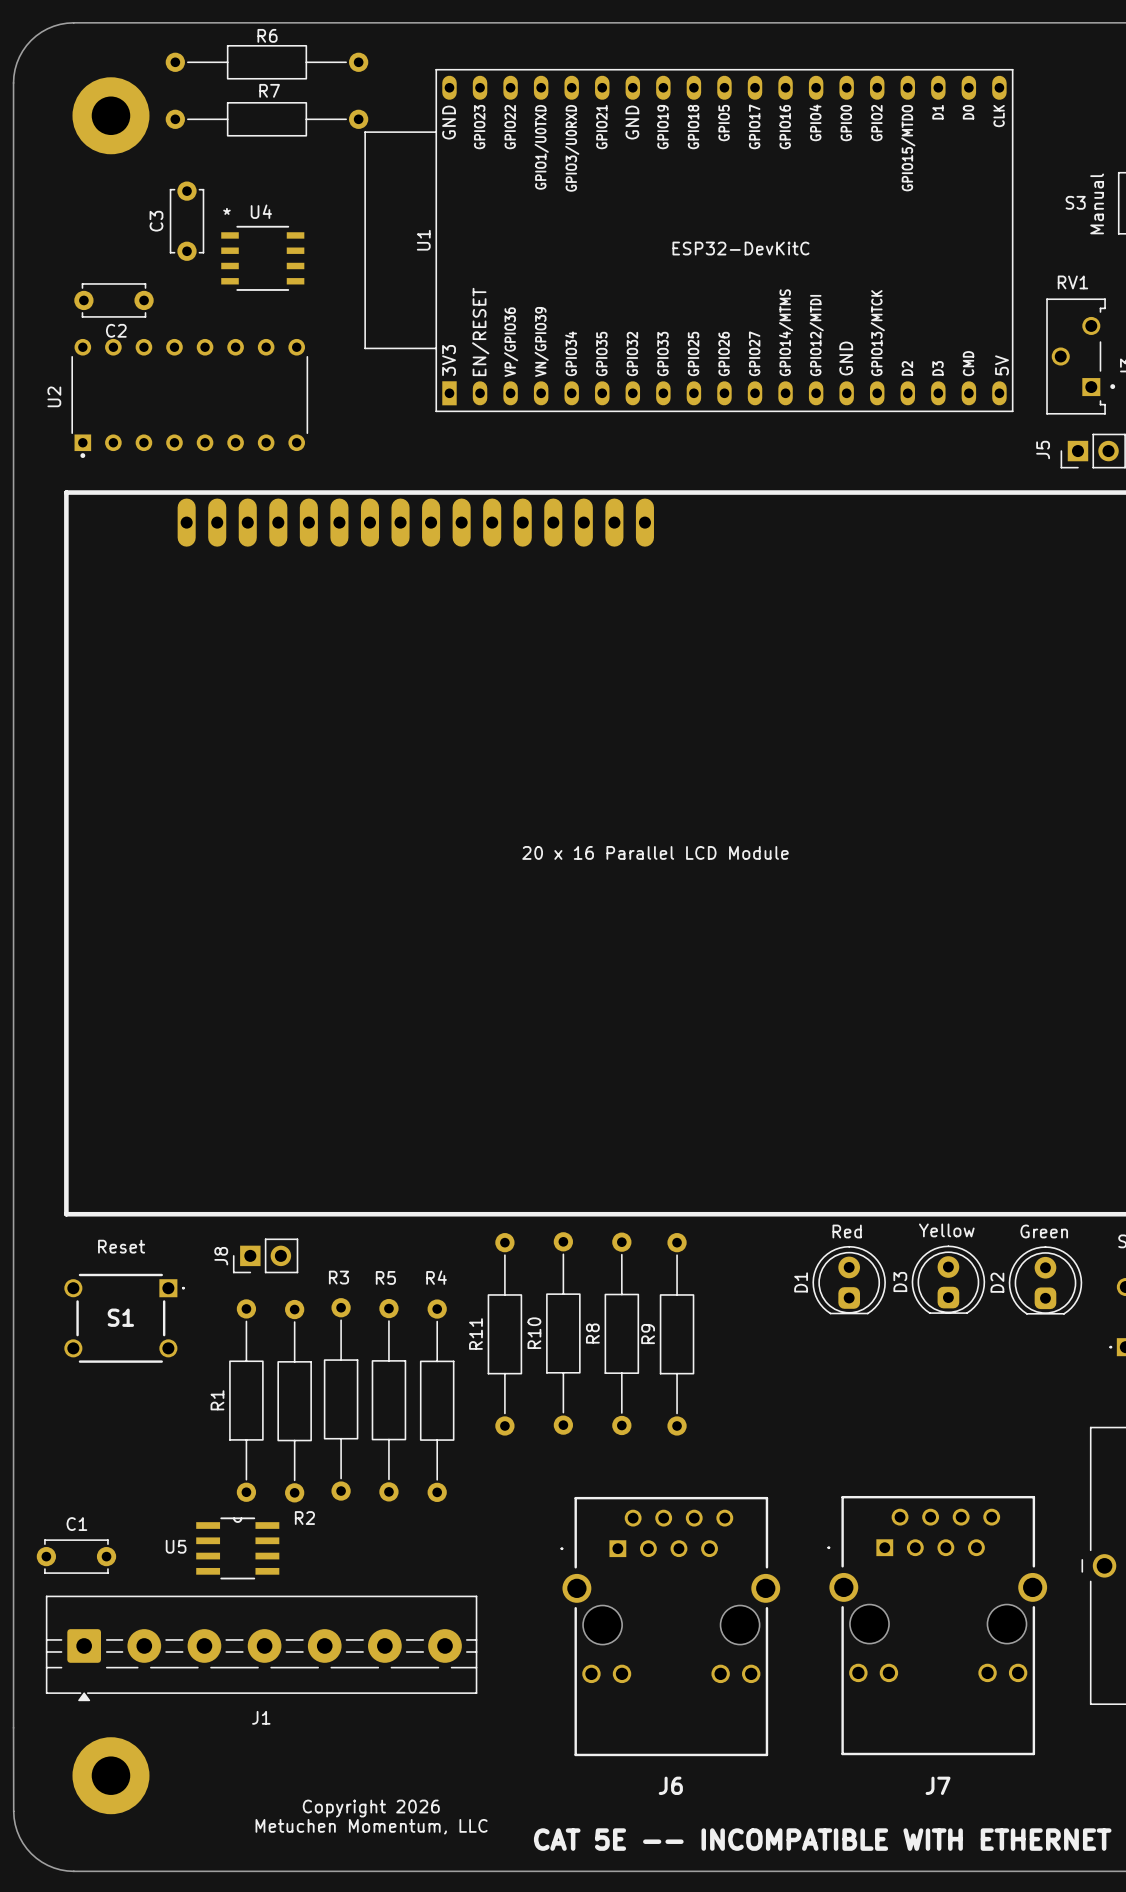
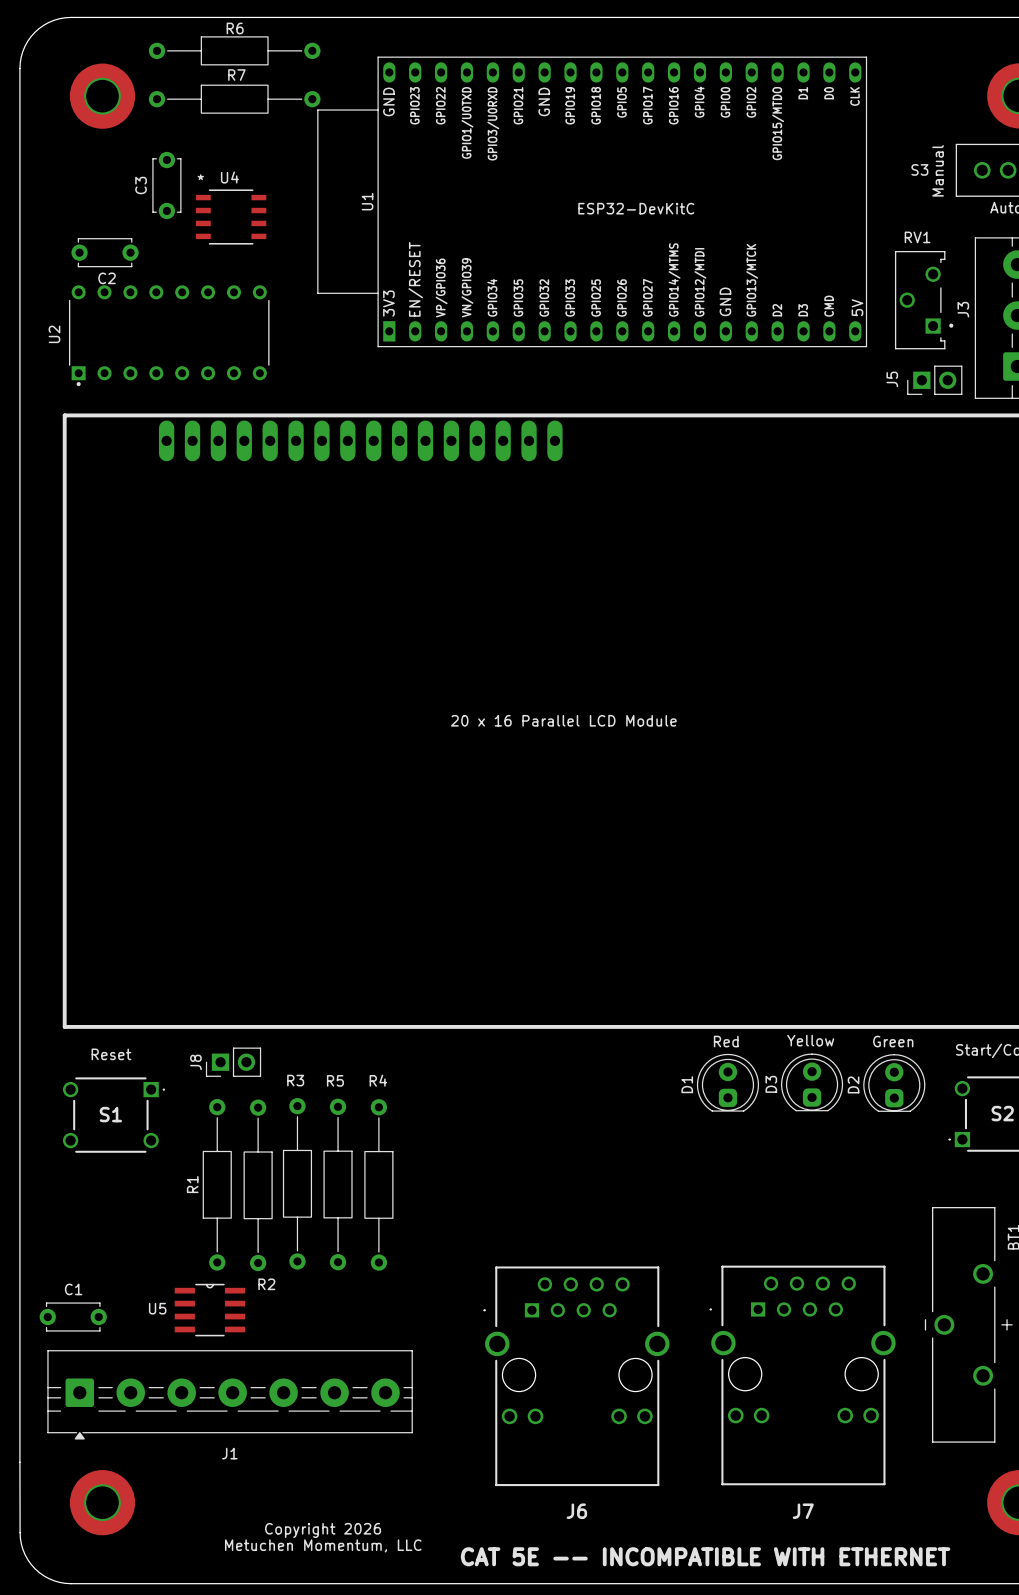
R10: (563, 1333) -> none
R8: (621, 1333) -> none
R11: (504, 1334) -> none
R9: (677, 1334) -> none

